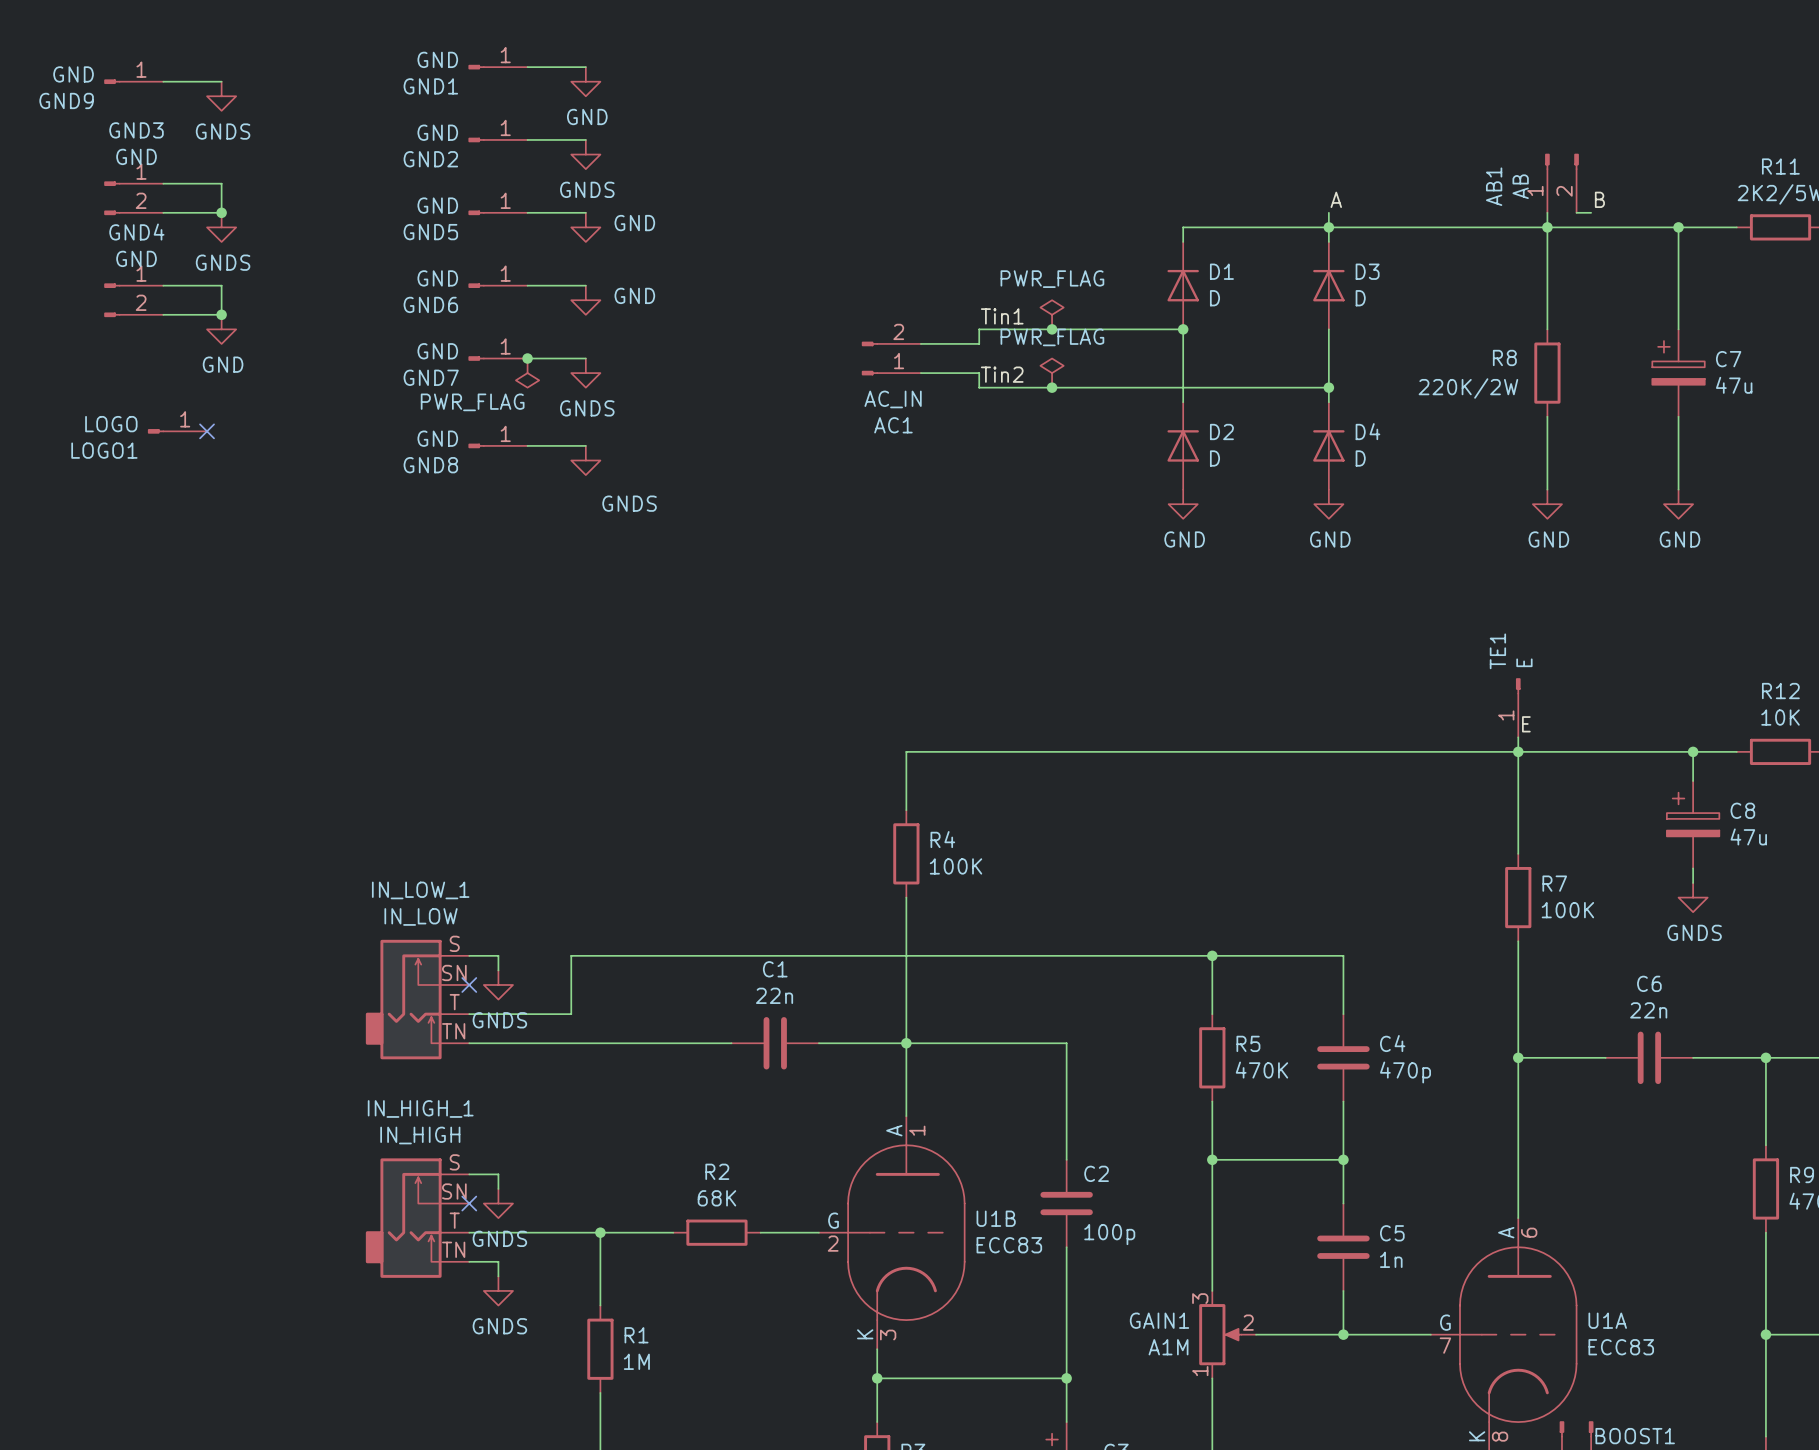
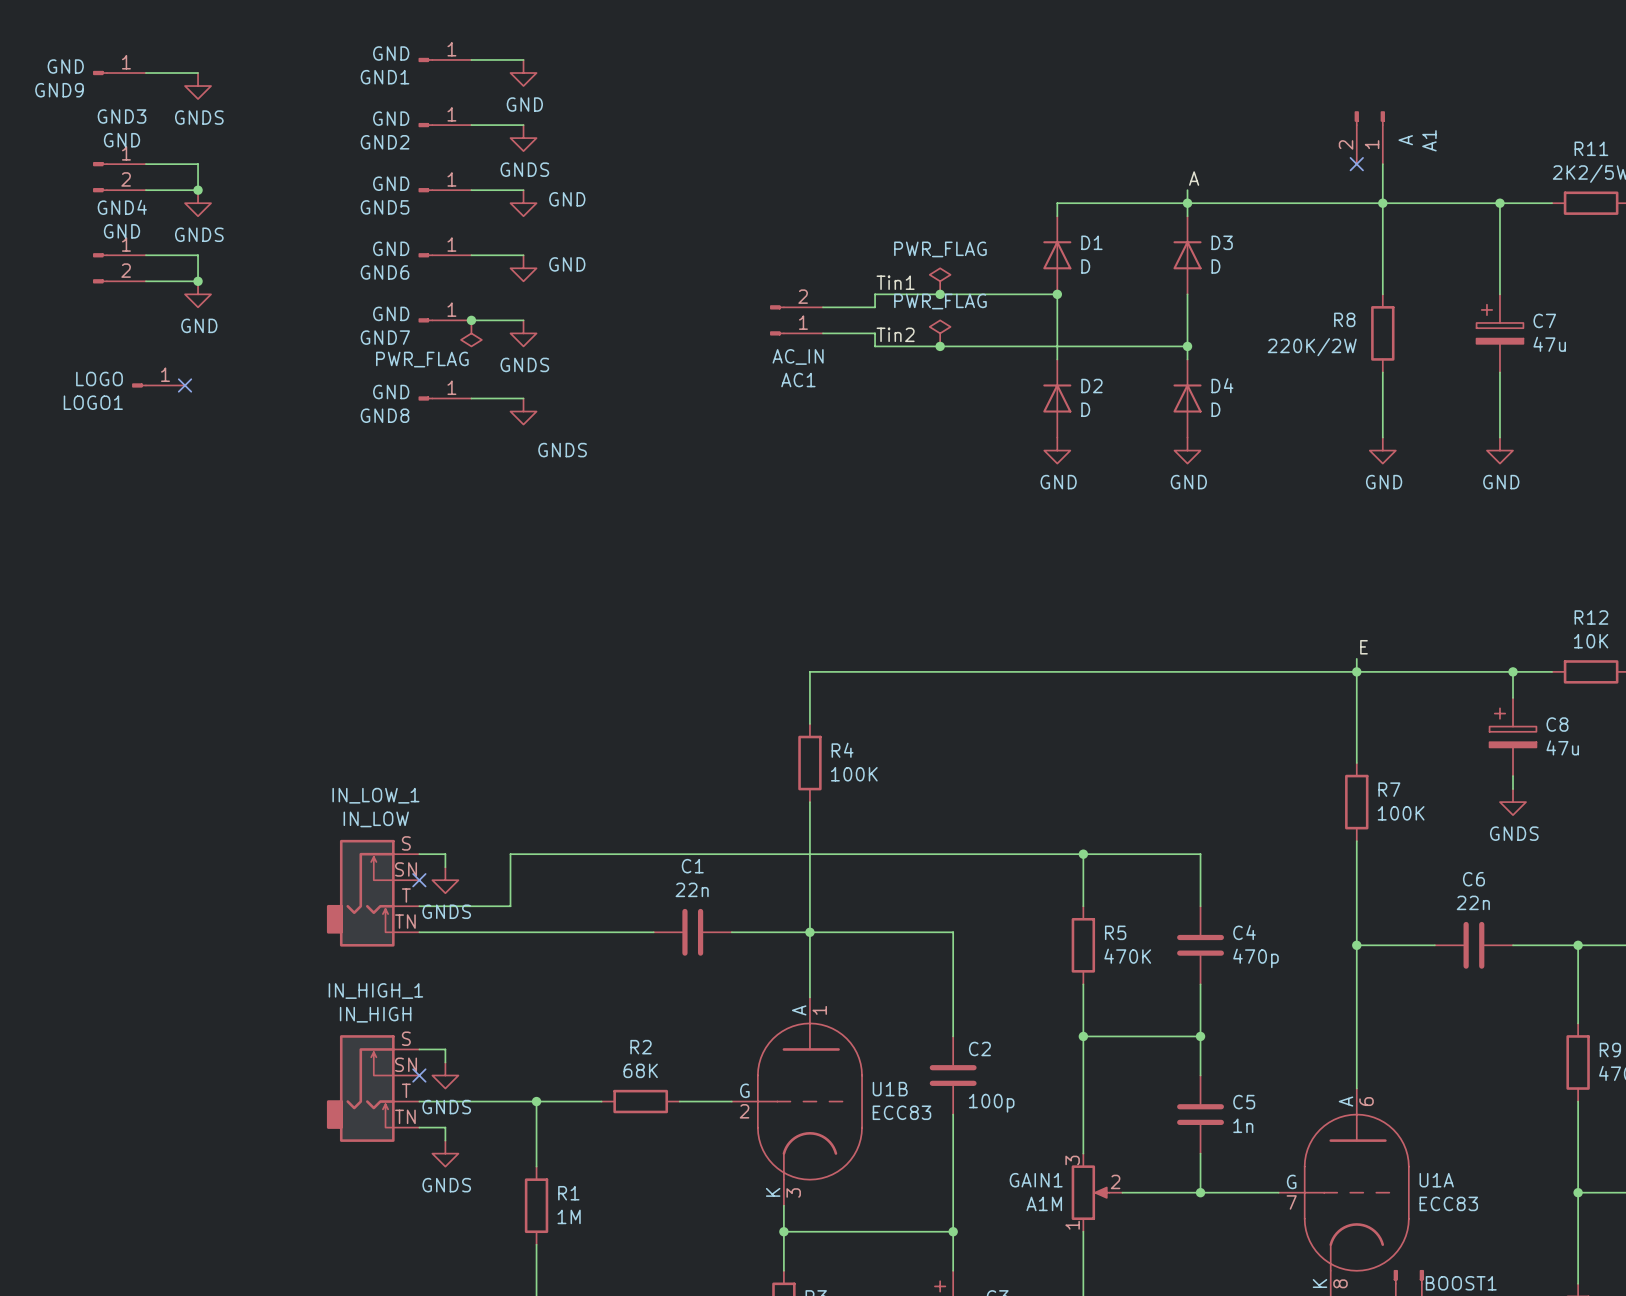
A1: none -> A (1369, 137)
no-connect mark: none -> (1356, 164)
AB1: AB (1561, 183) -> none
label: B (1599, 199) -> none
wire: (1576, 212) (1591, 212) -> none
TE1: E (1518, 707) -> none

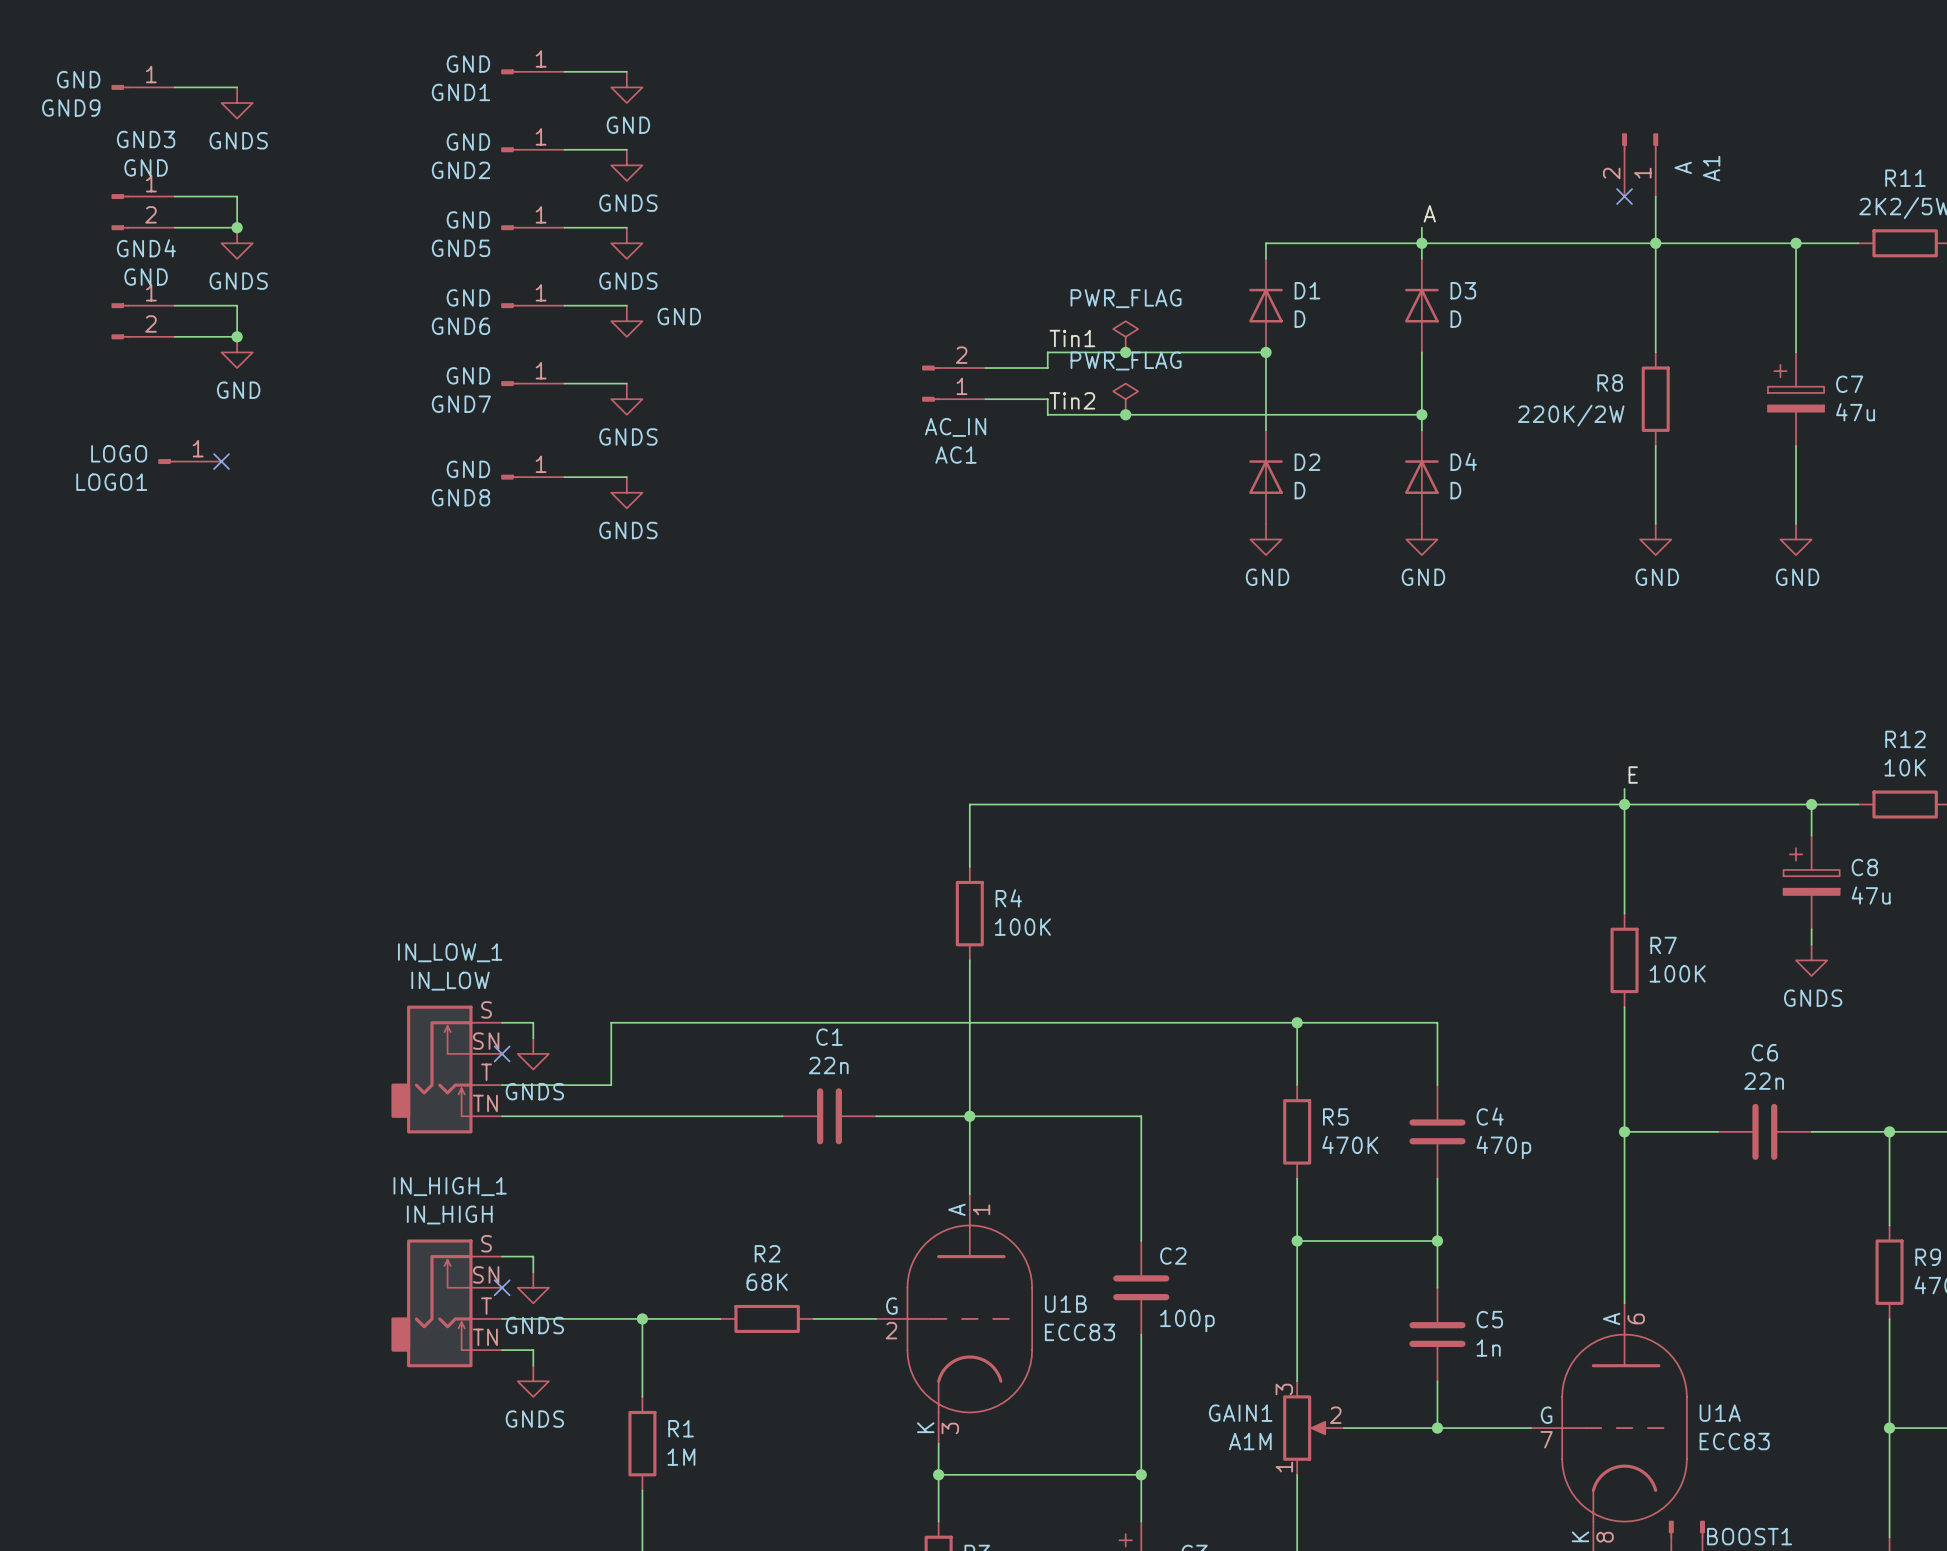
power symbol: GND (523, 203) -> GNDS (626, 243)
junction: (471, 320) -> none
power symbol: PWR_FLAG (471, 333) -> none
power symbol text position: GNDS (562, 450) -> GNDS (628, 530)

